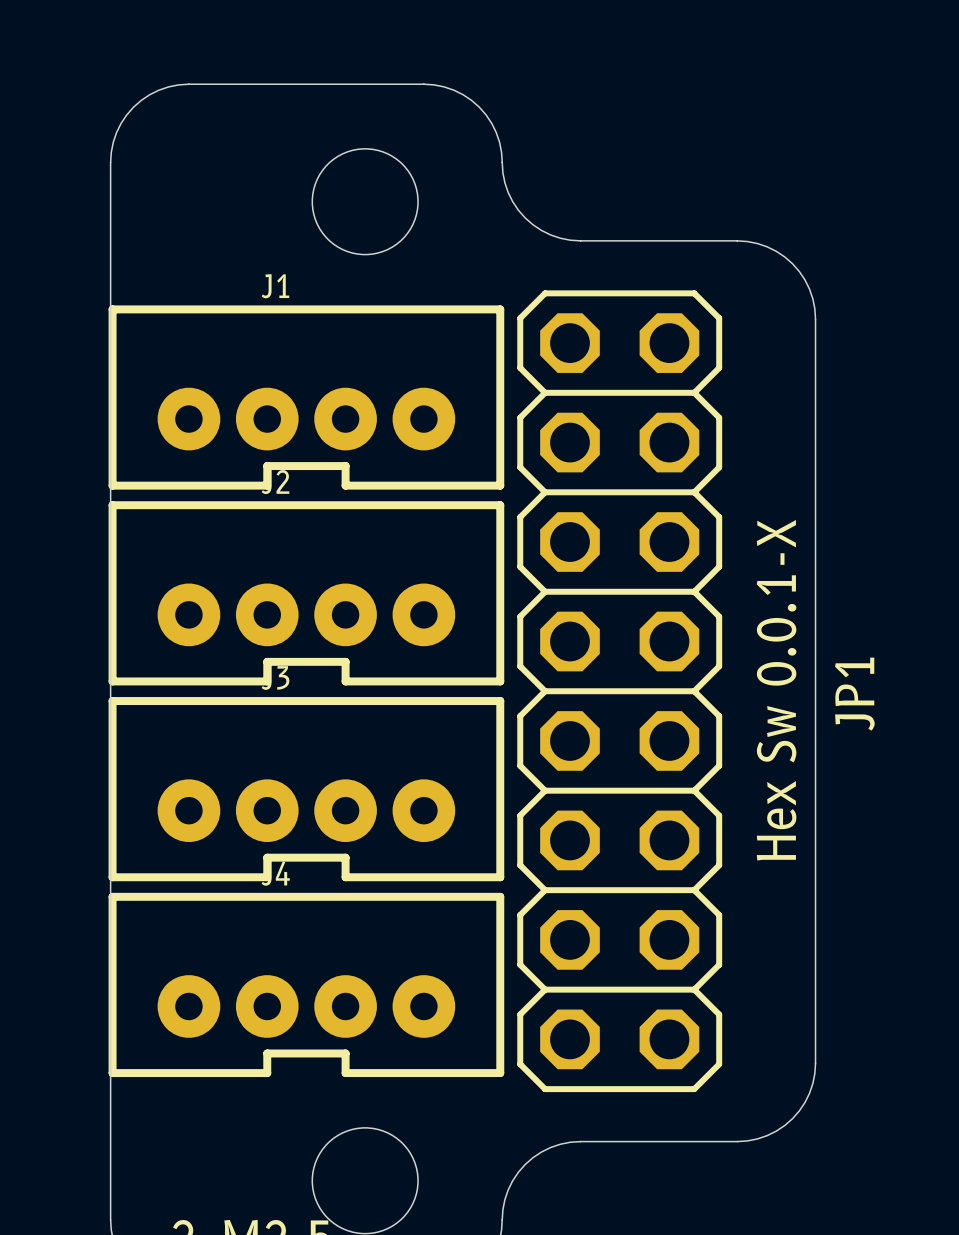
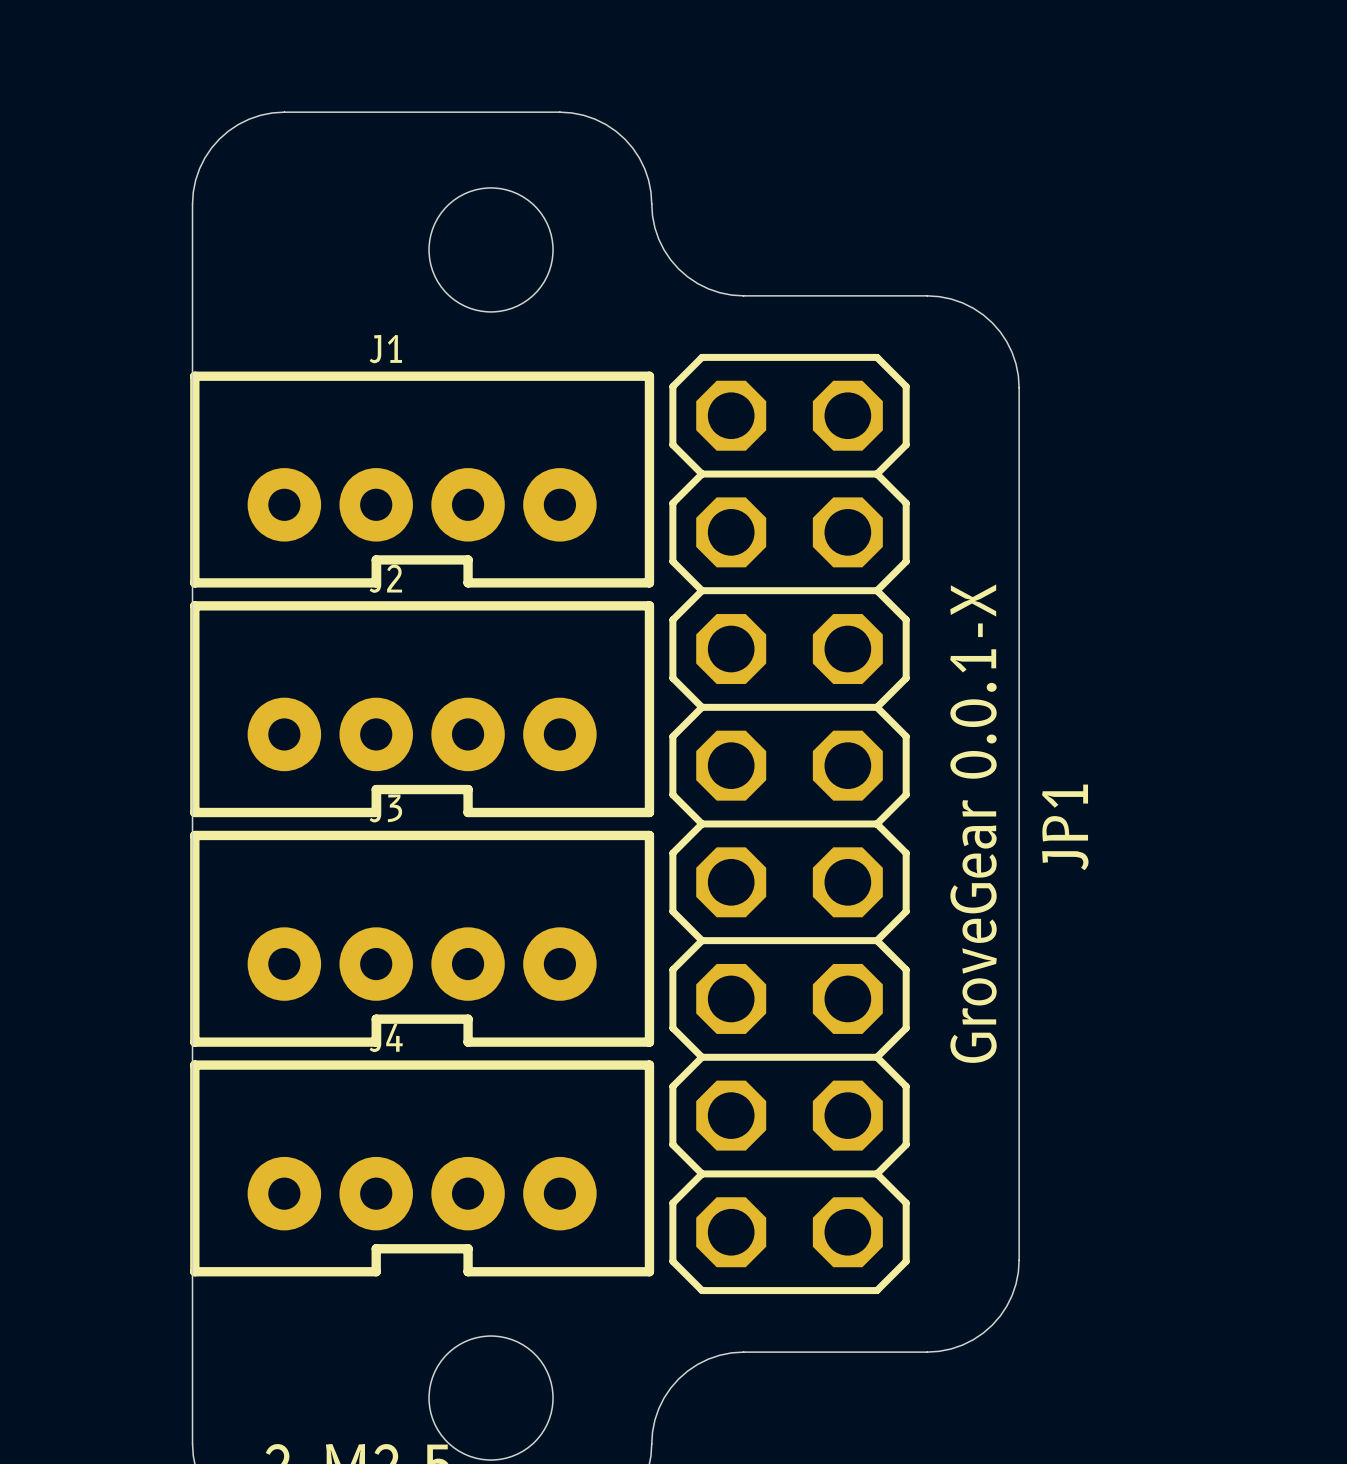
text: Hex Sw 0.0.1-X (776, 690) -> GroveGear 0.0.1-X (973, 823)

